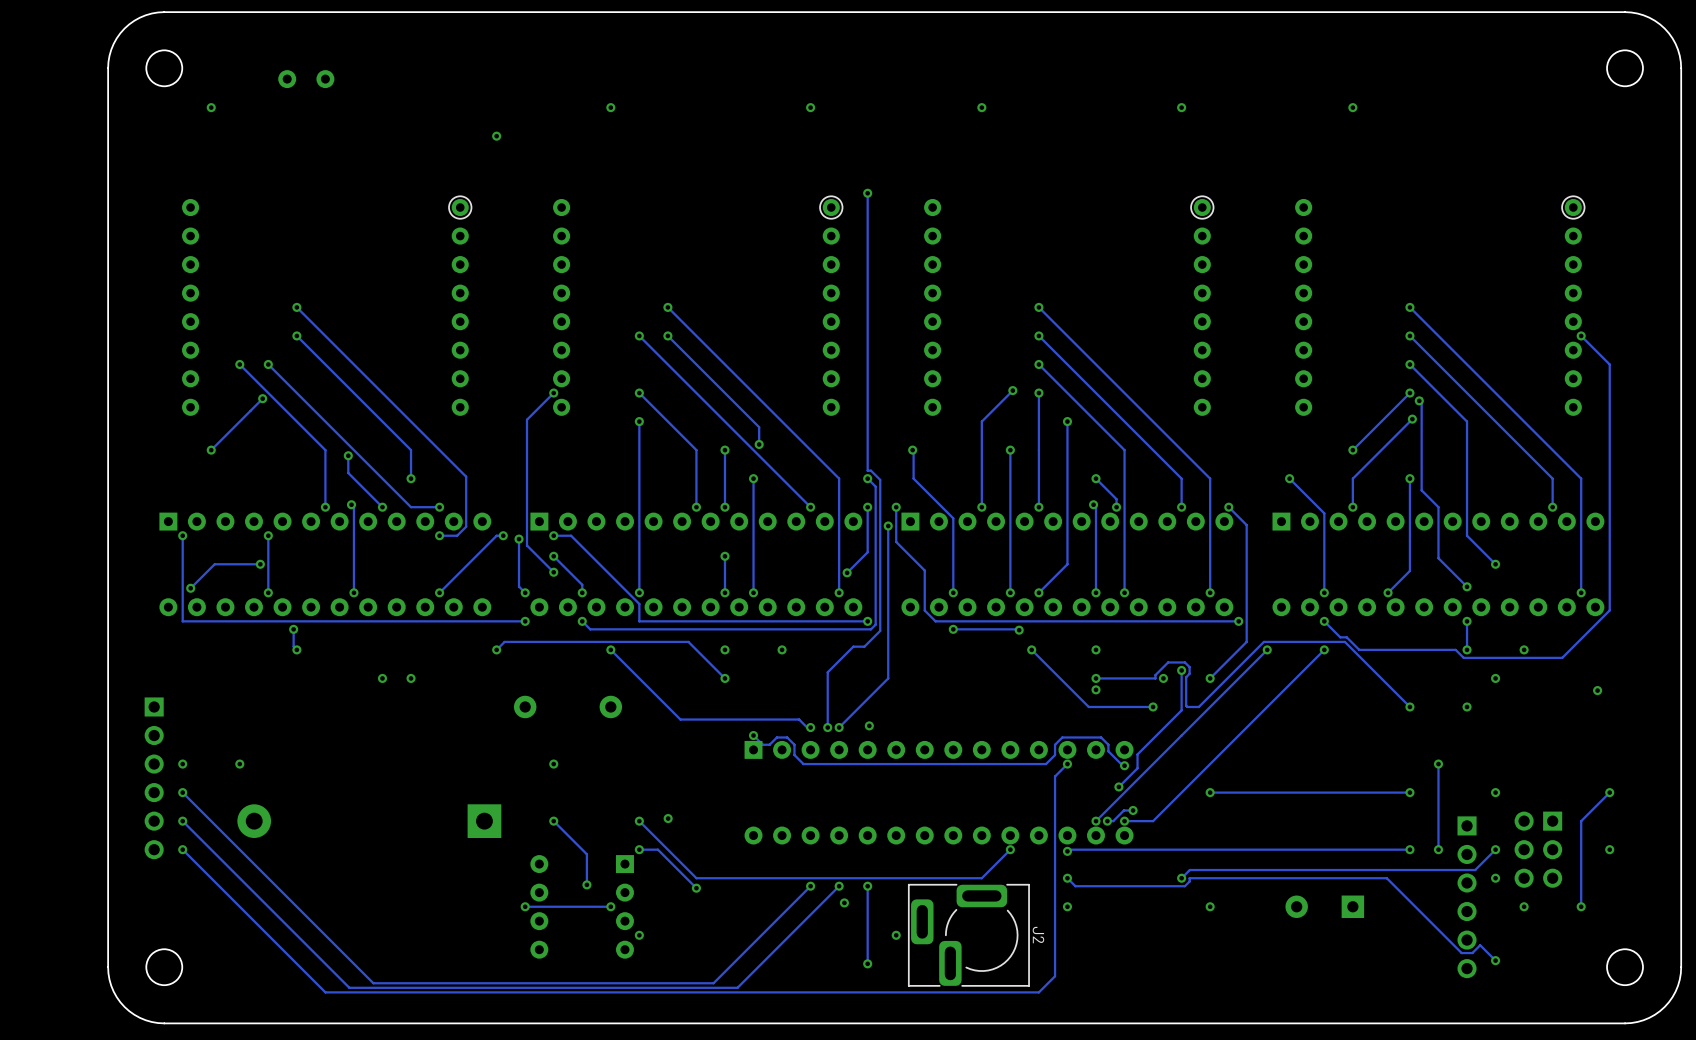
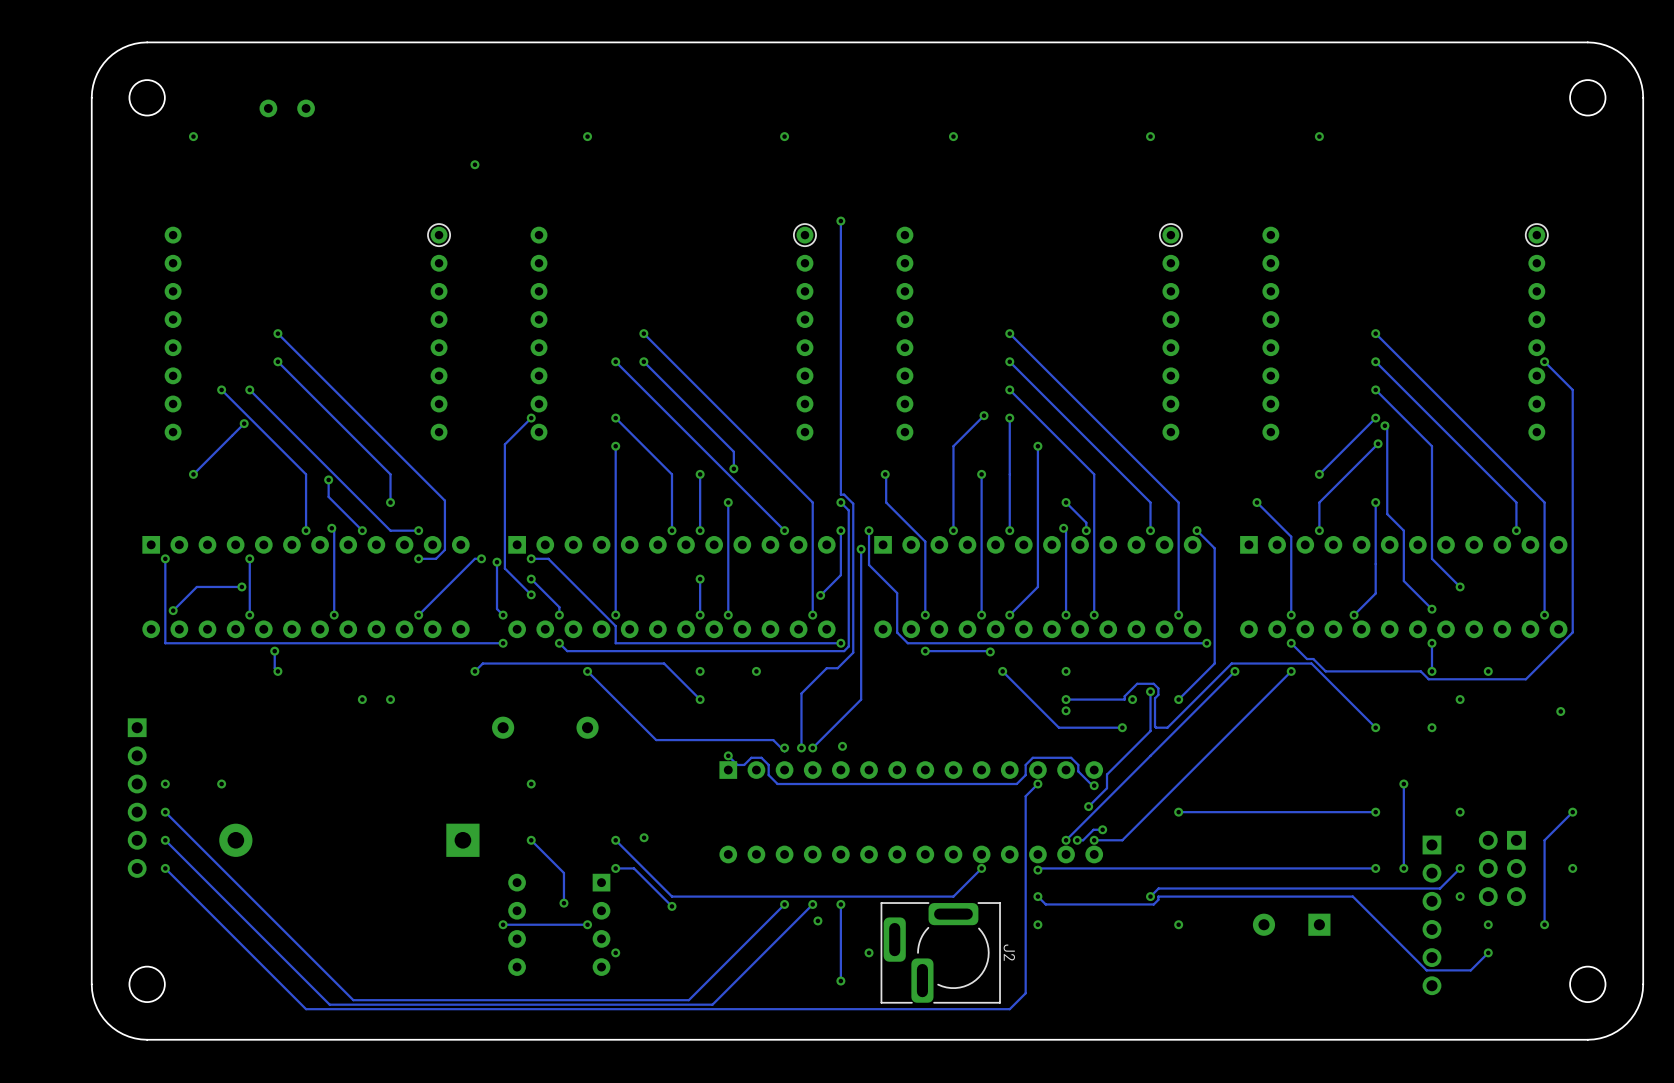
track: (1472, 953) (1480, 945) (1495, 960) -> (1437, 970) (1470, 970) (1488, 952)
via position: (1495, 960) -> (1488, 952)

